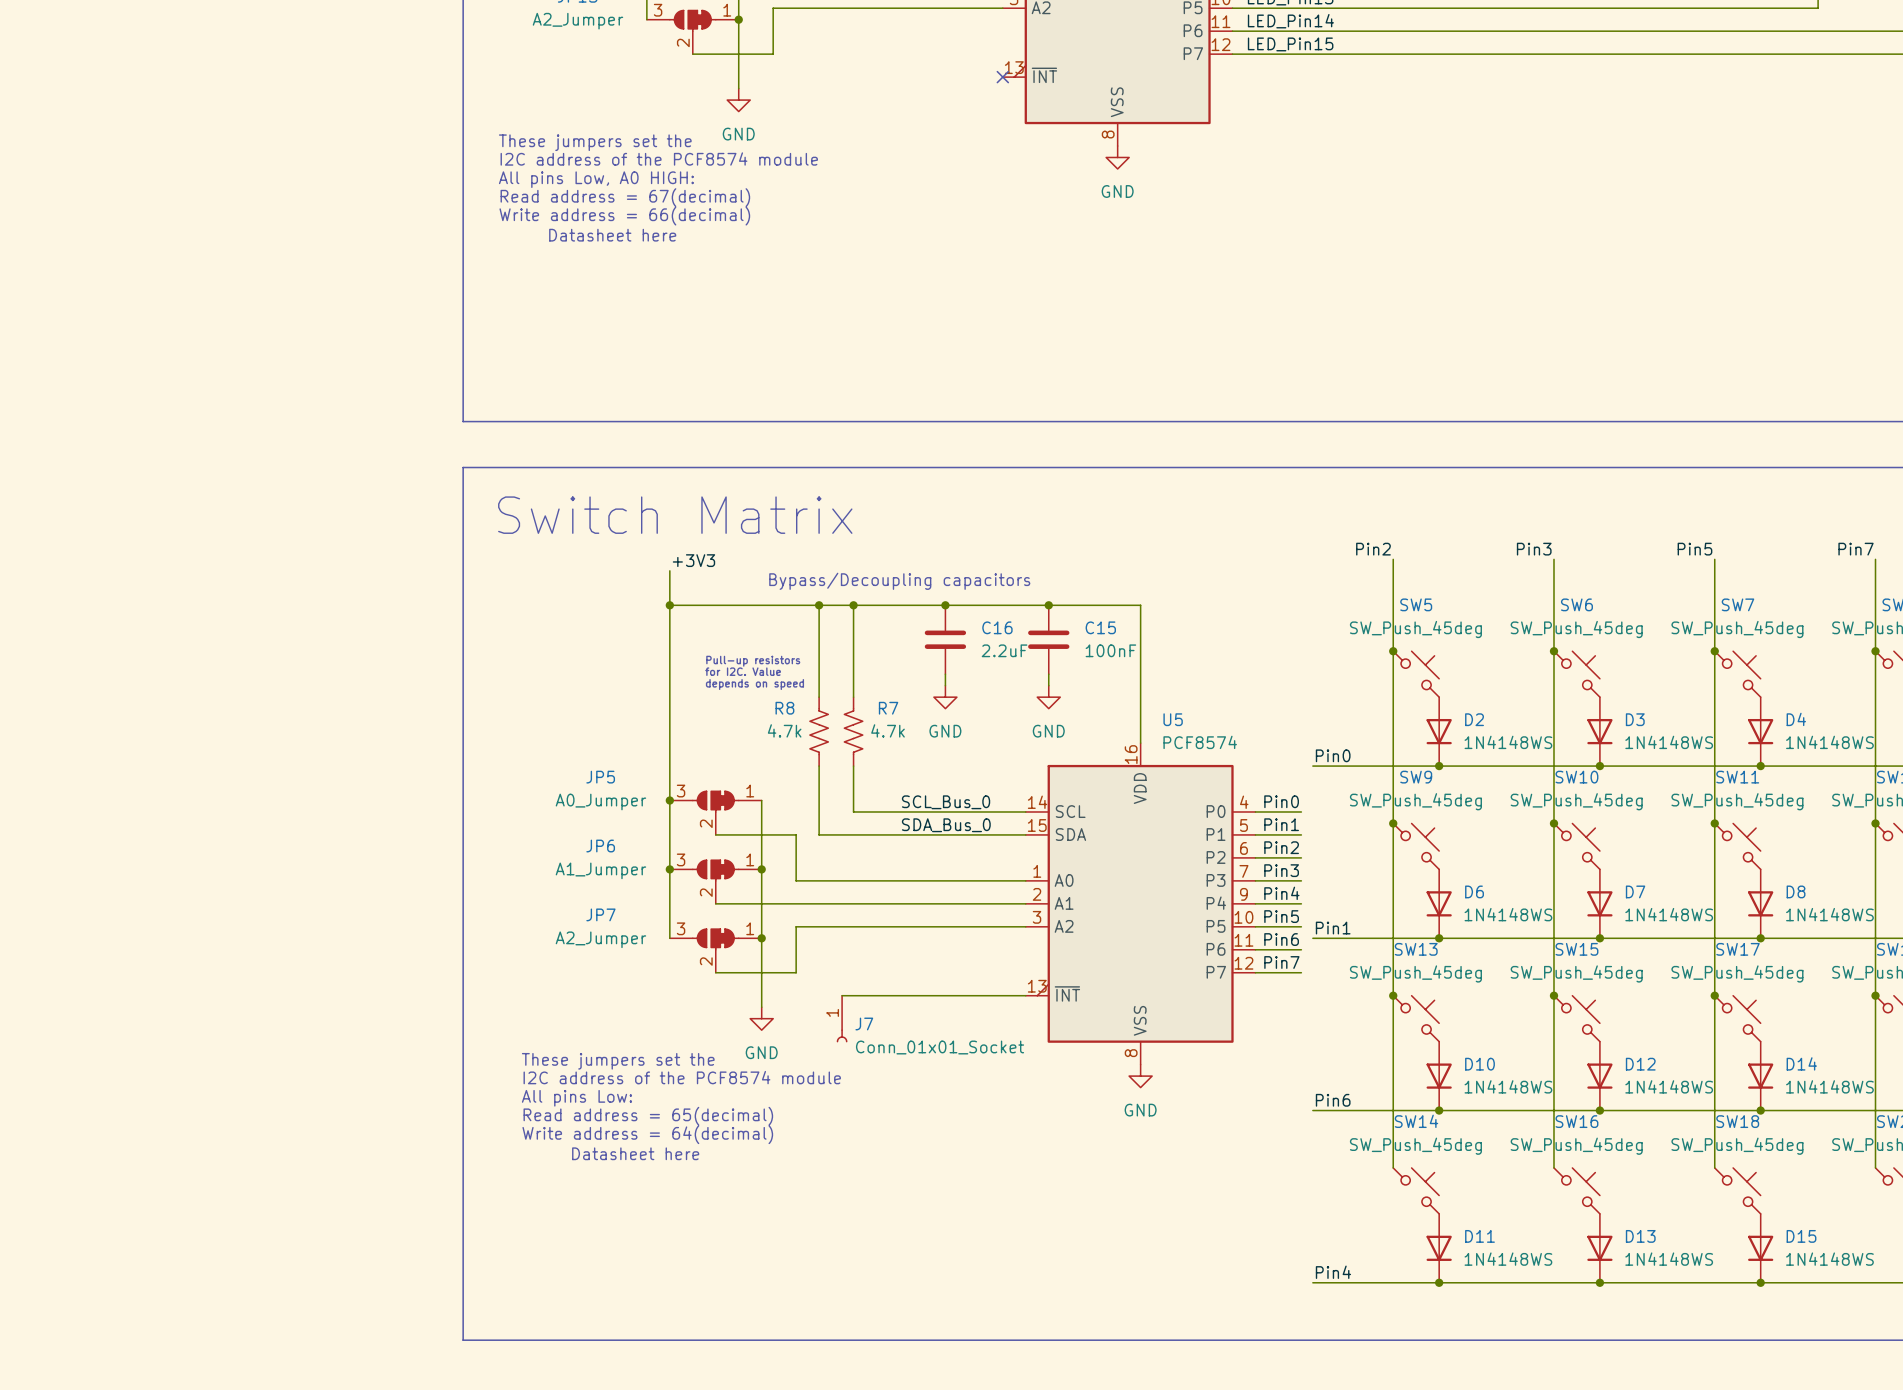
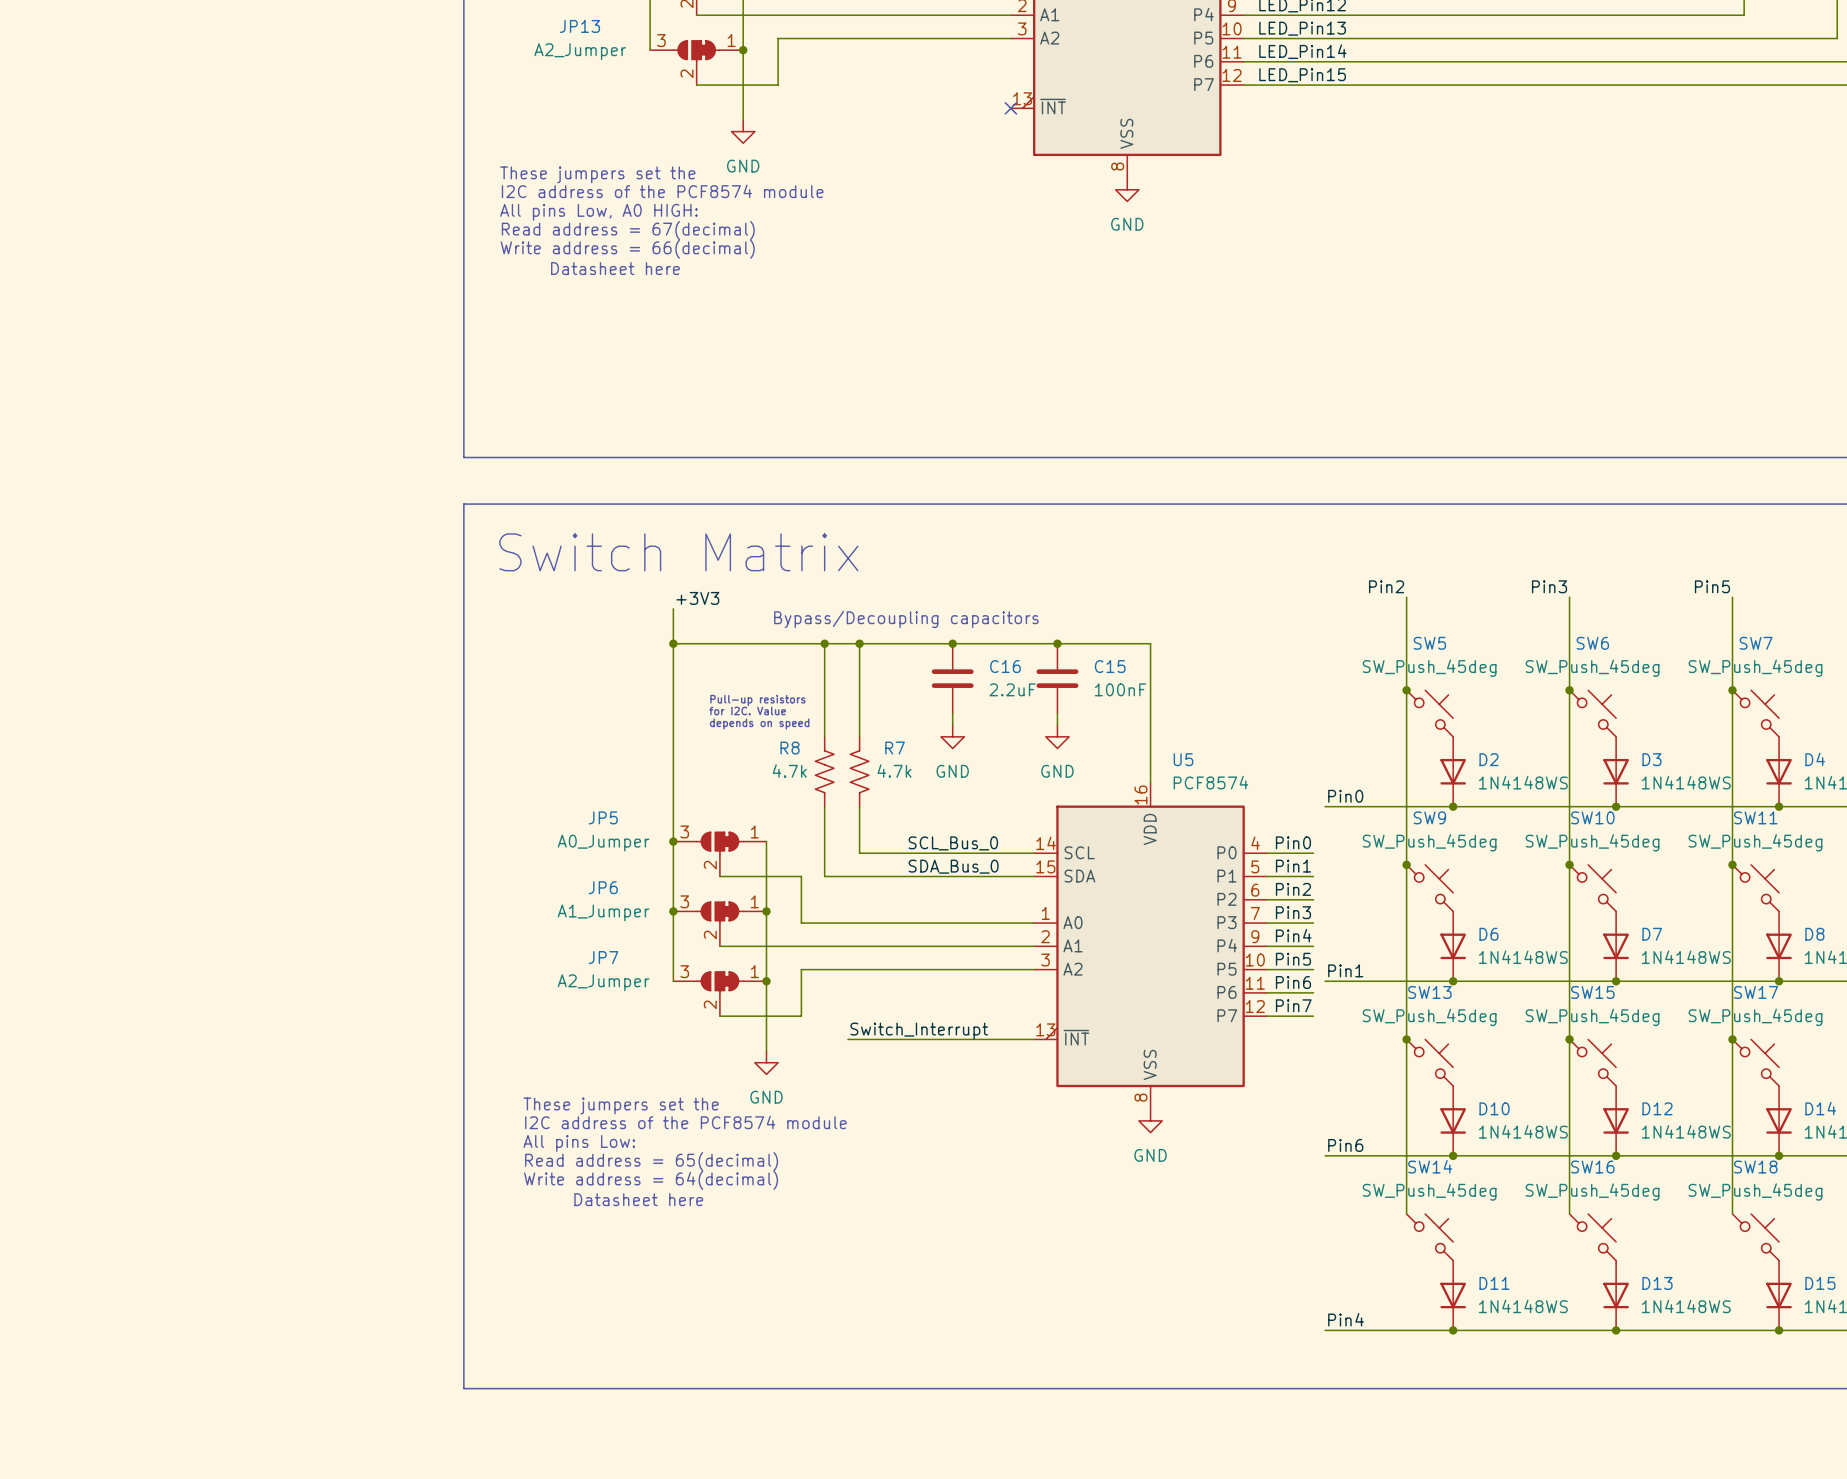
label: none -> Switch_Interrupt (919, 1031)
J7: Conn_01x01_Socket (842, 1019) -> none

